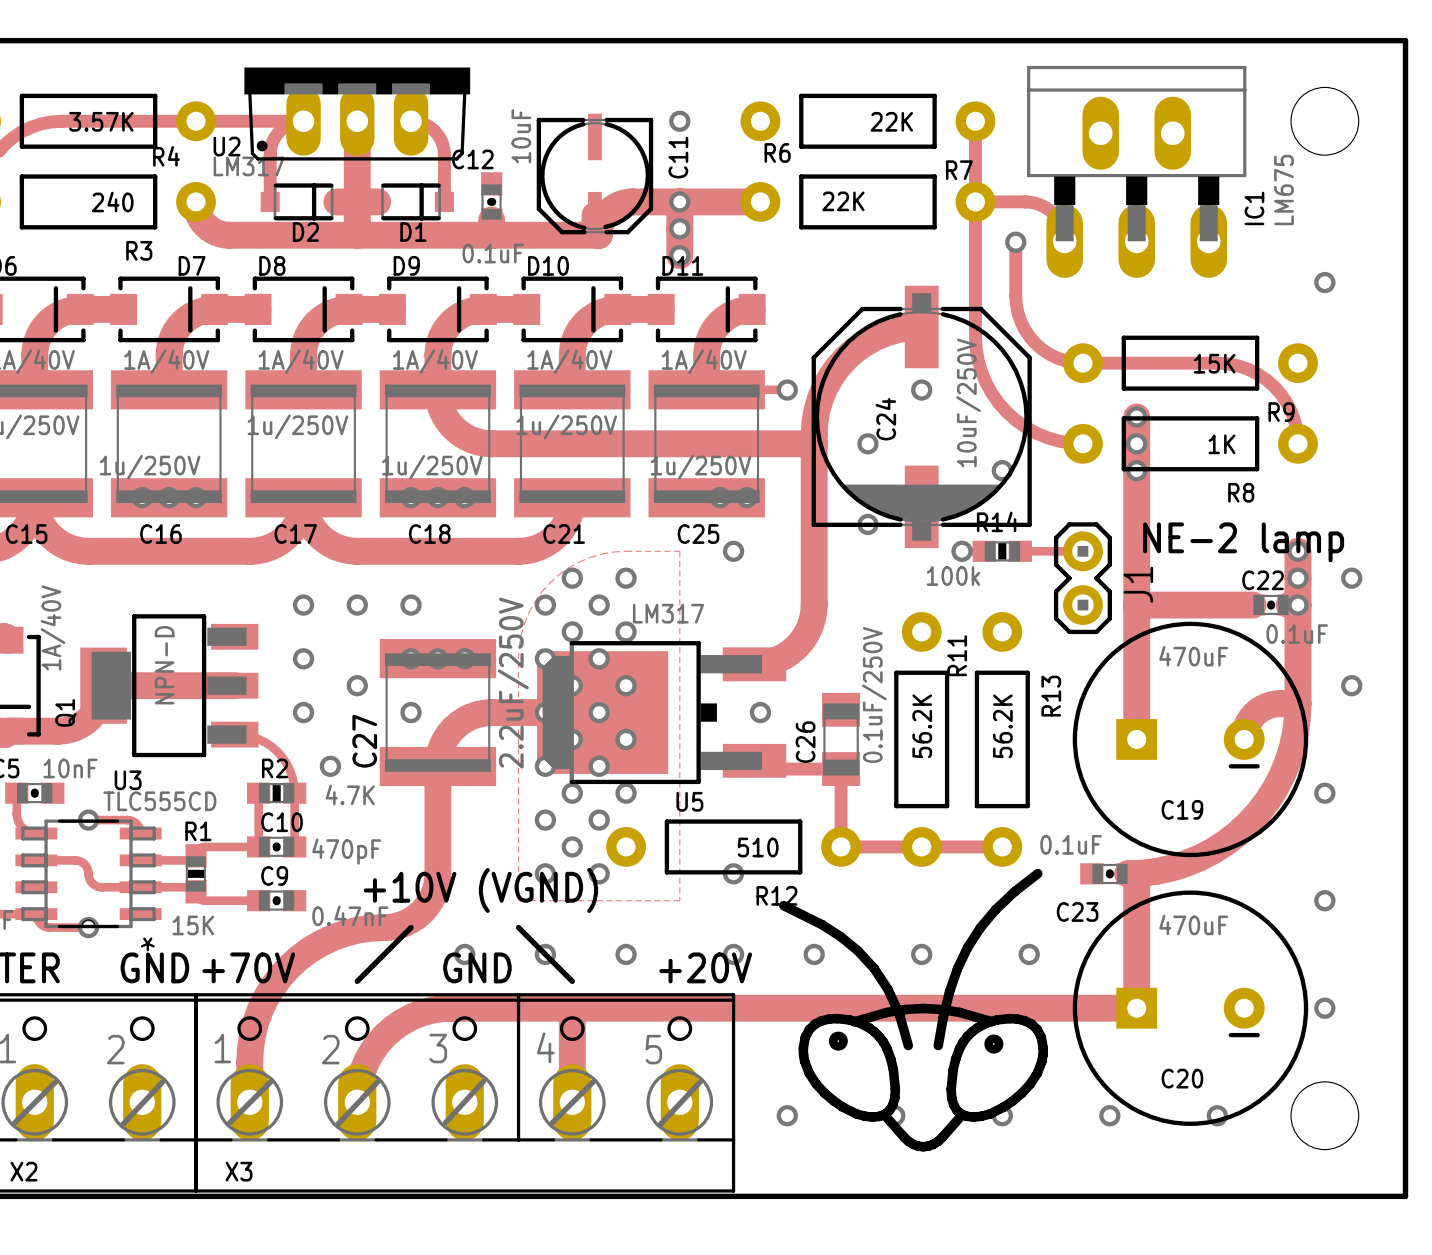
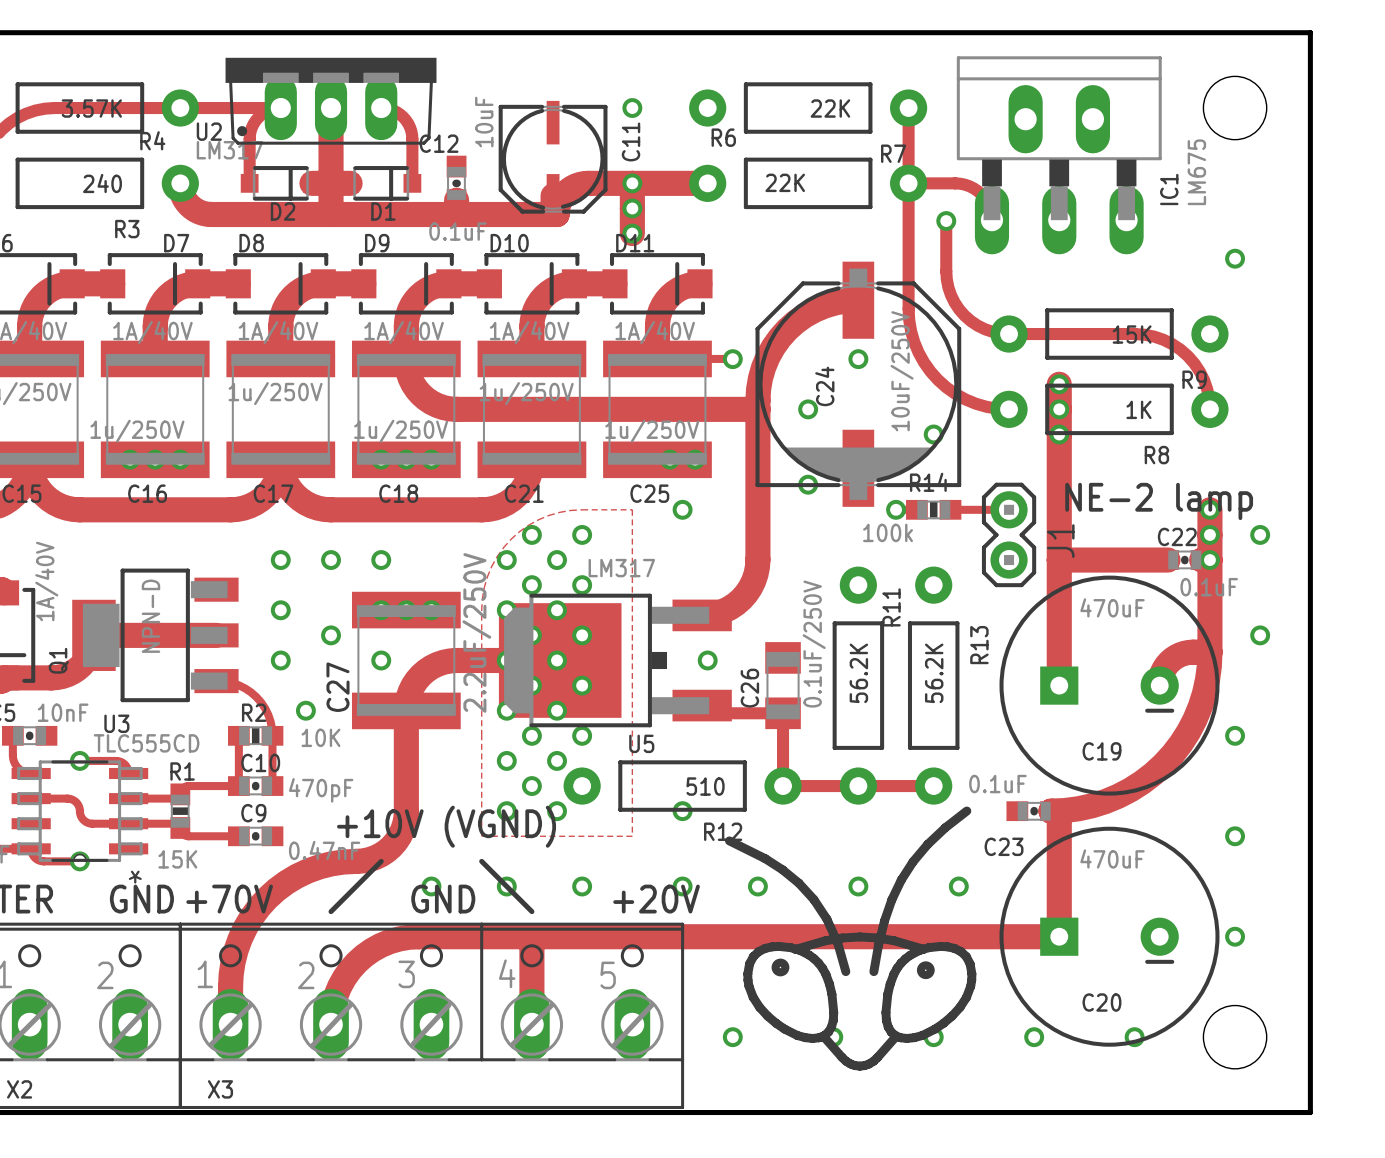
R2 value: 4.7K (350, 794) -> 10K (320, 737)

